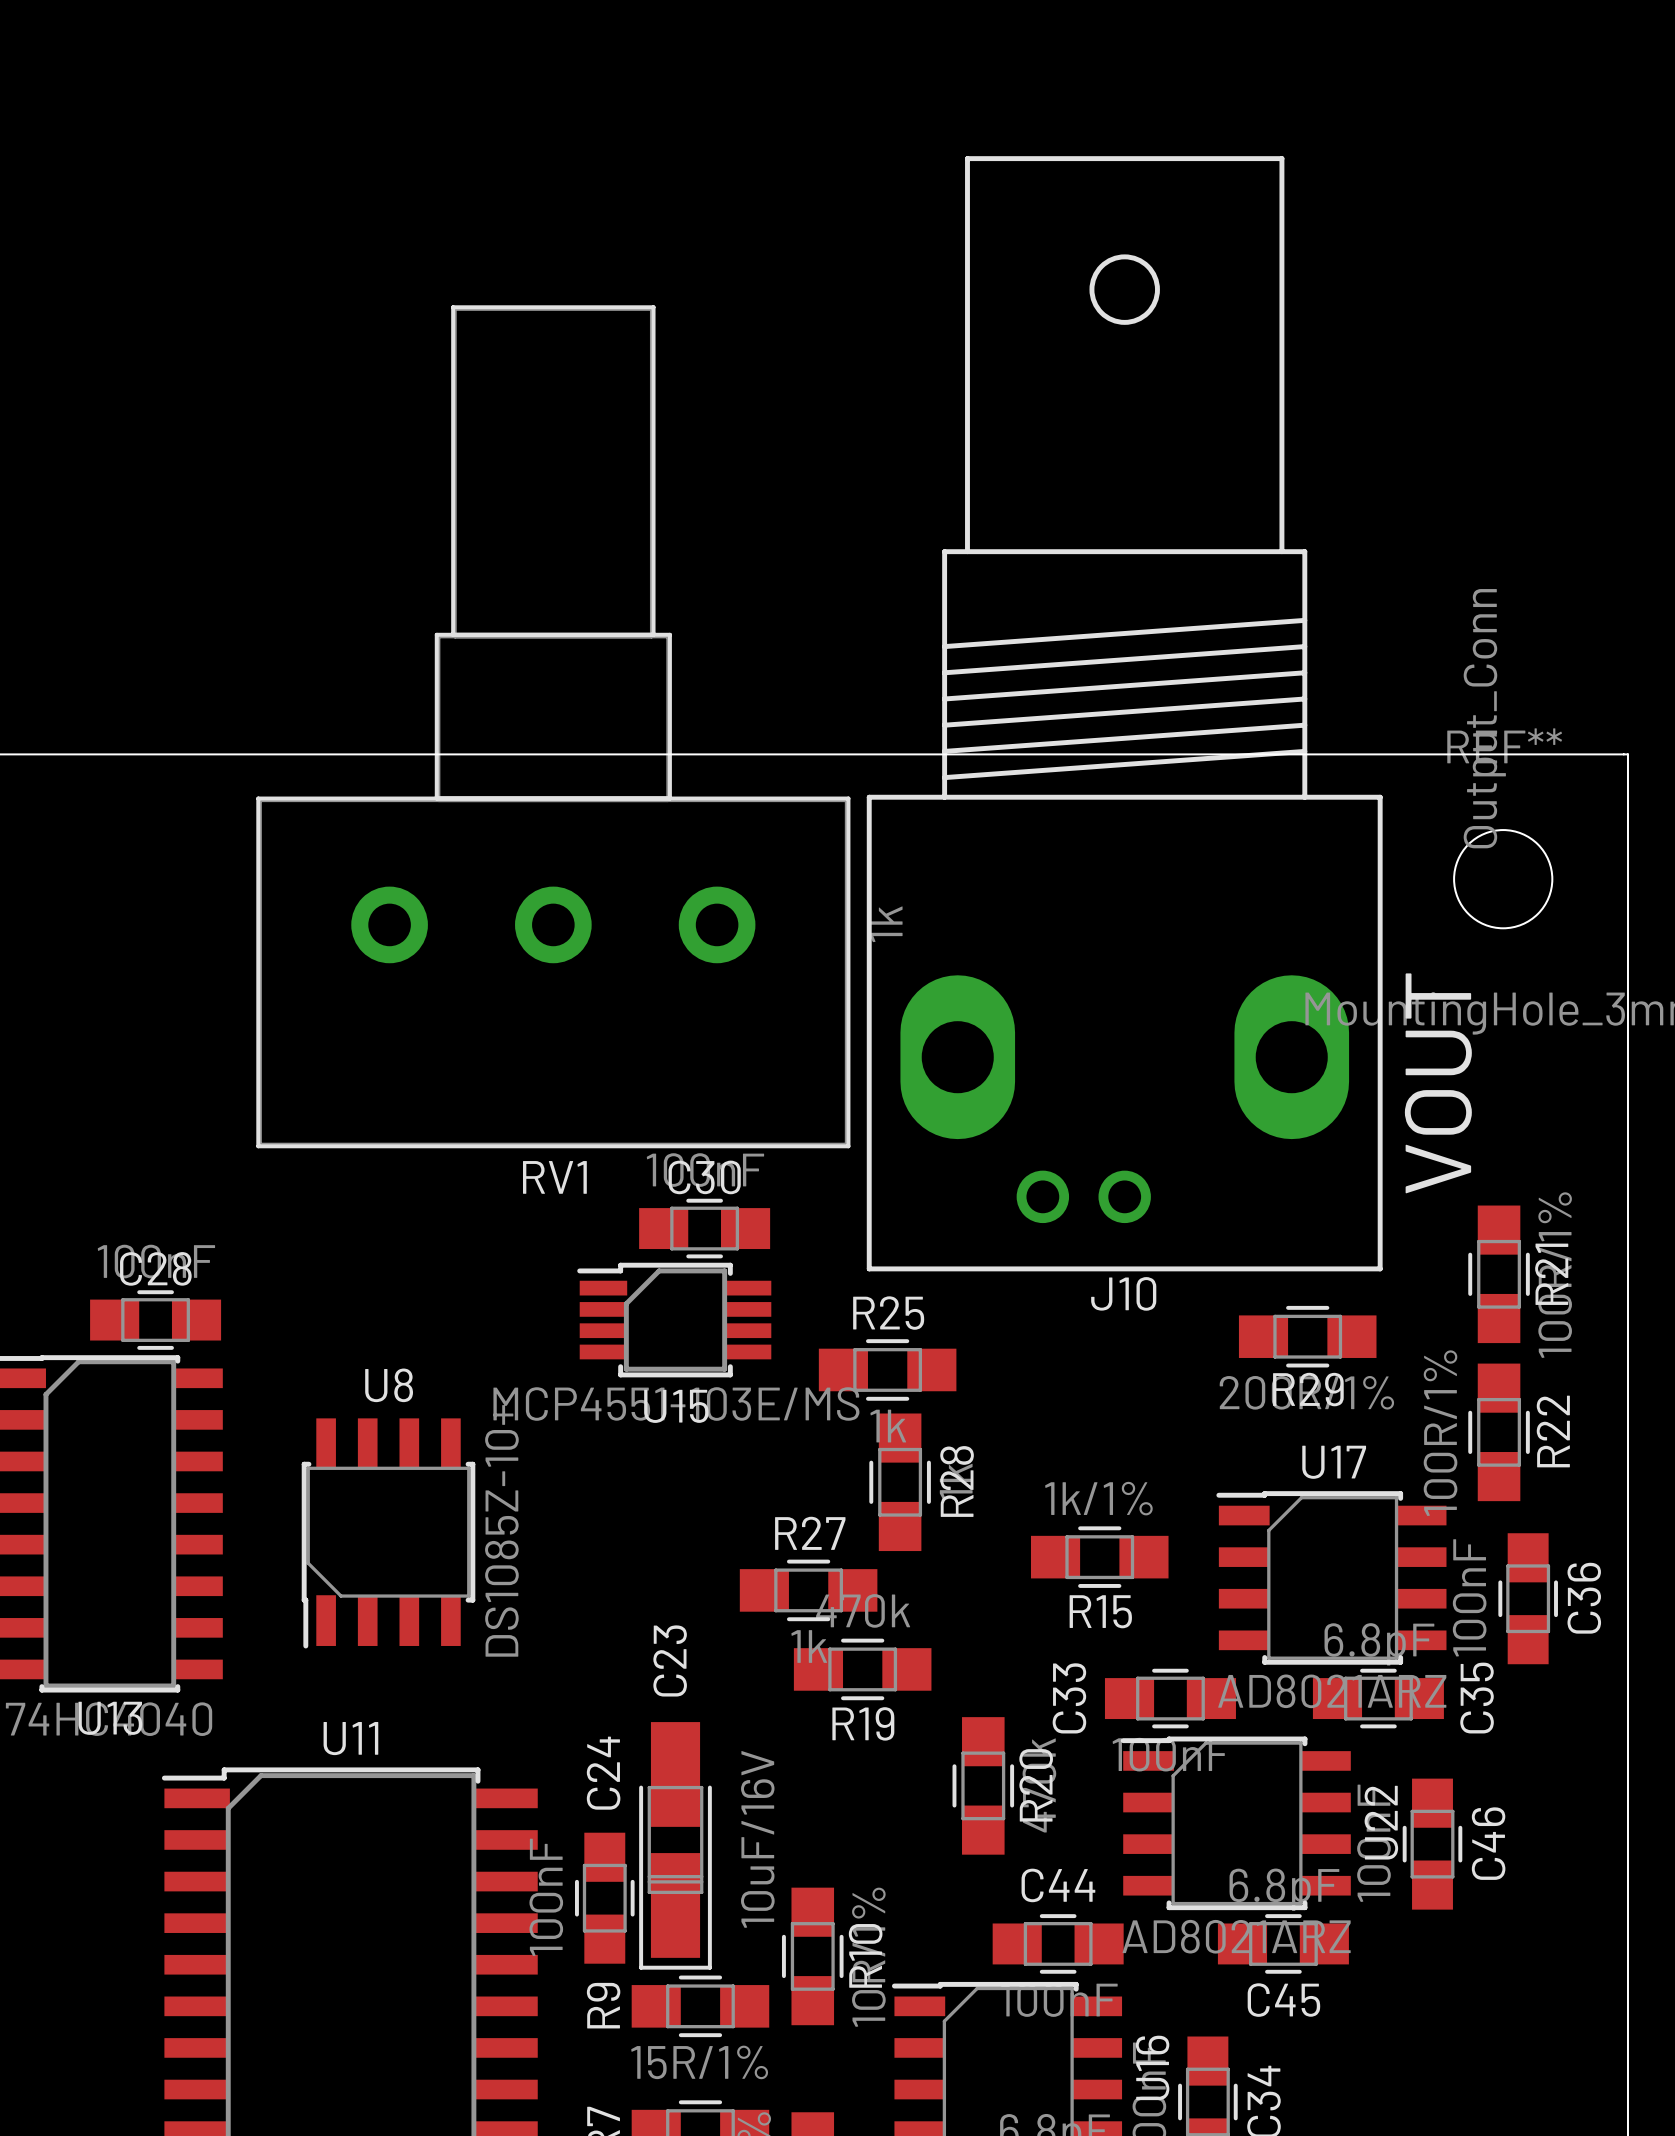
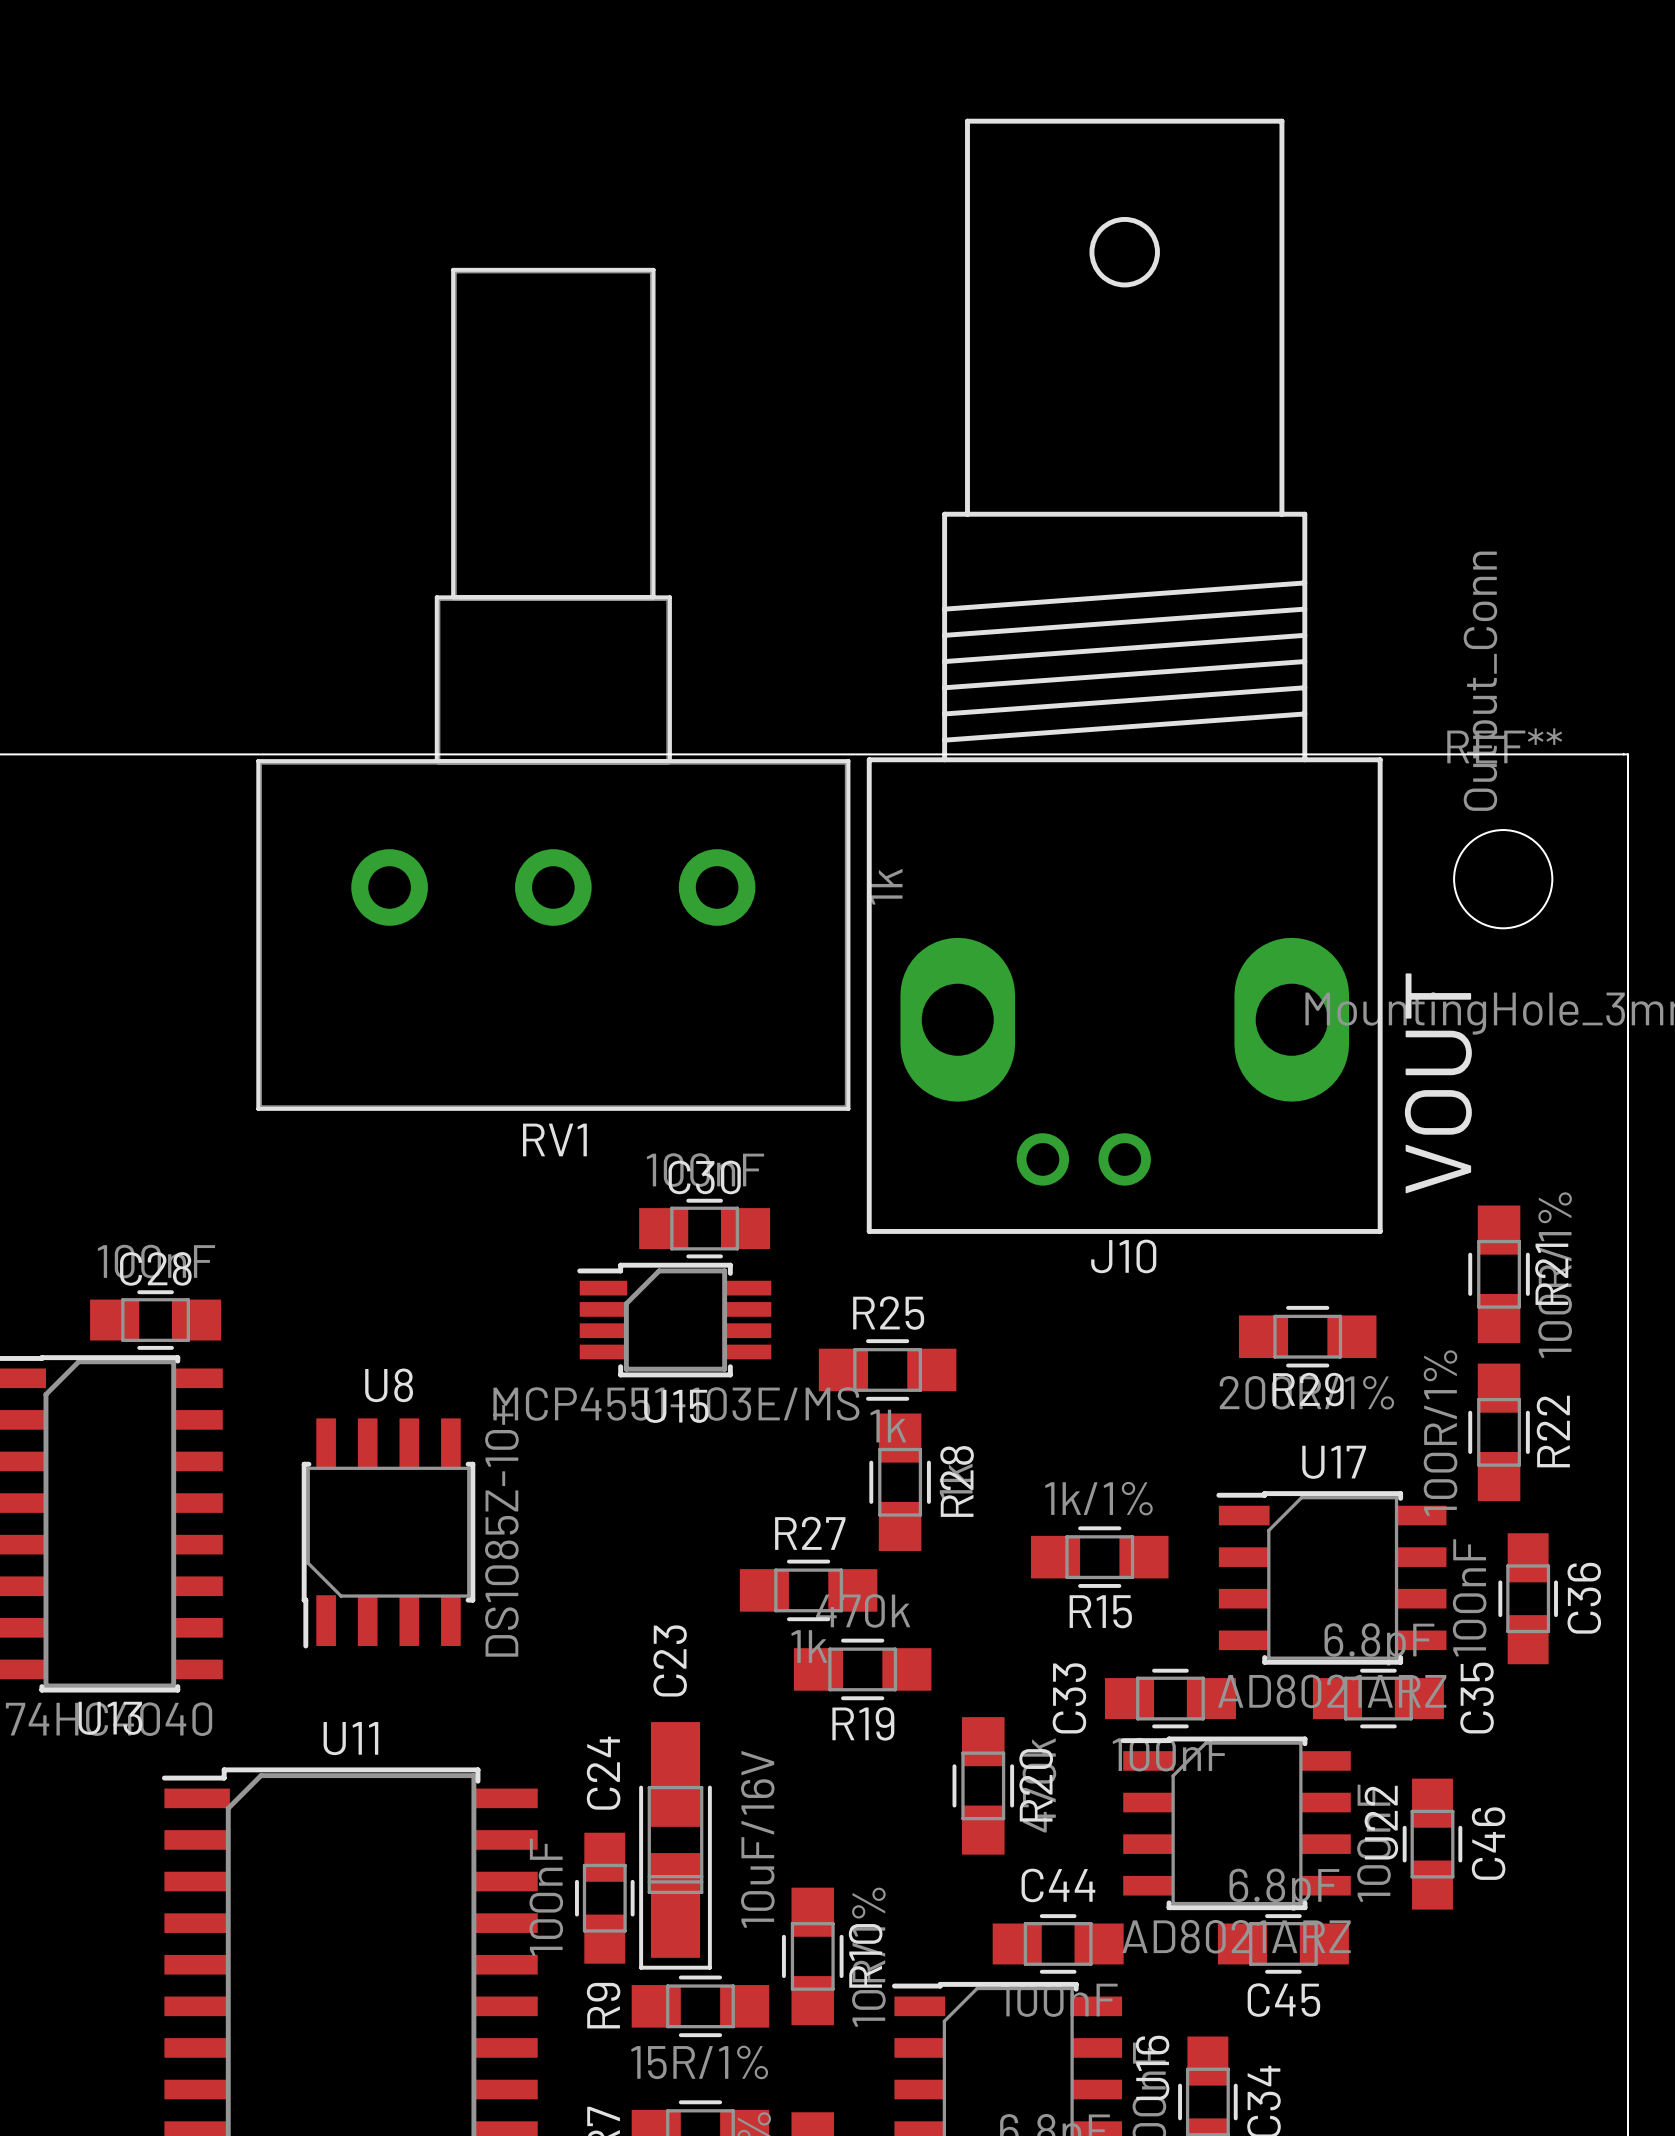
J10 position: (1124, 713) -> (1124, 676)
RV1 position: (553, 726) -> (553, 689)

